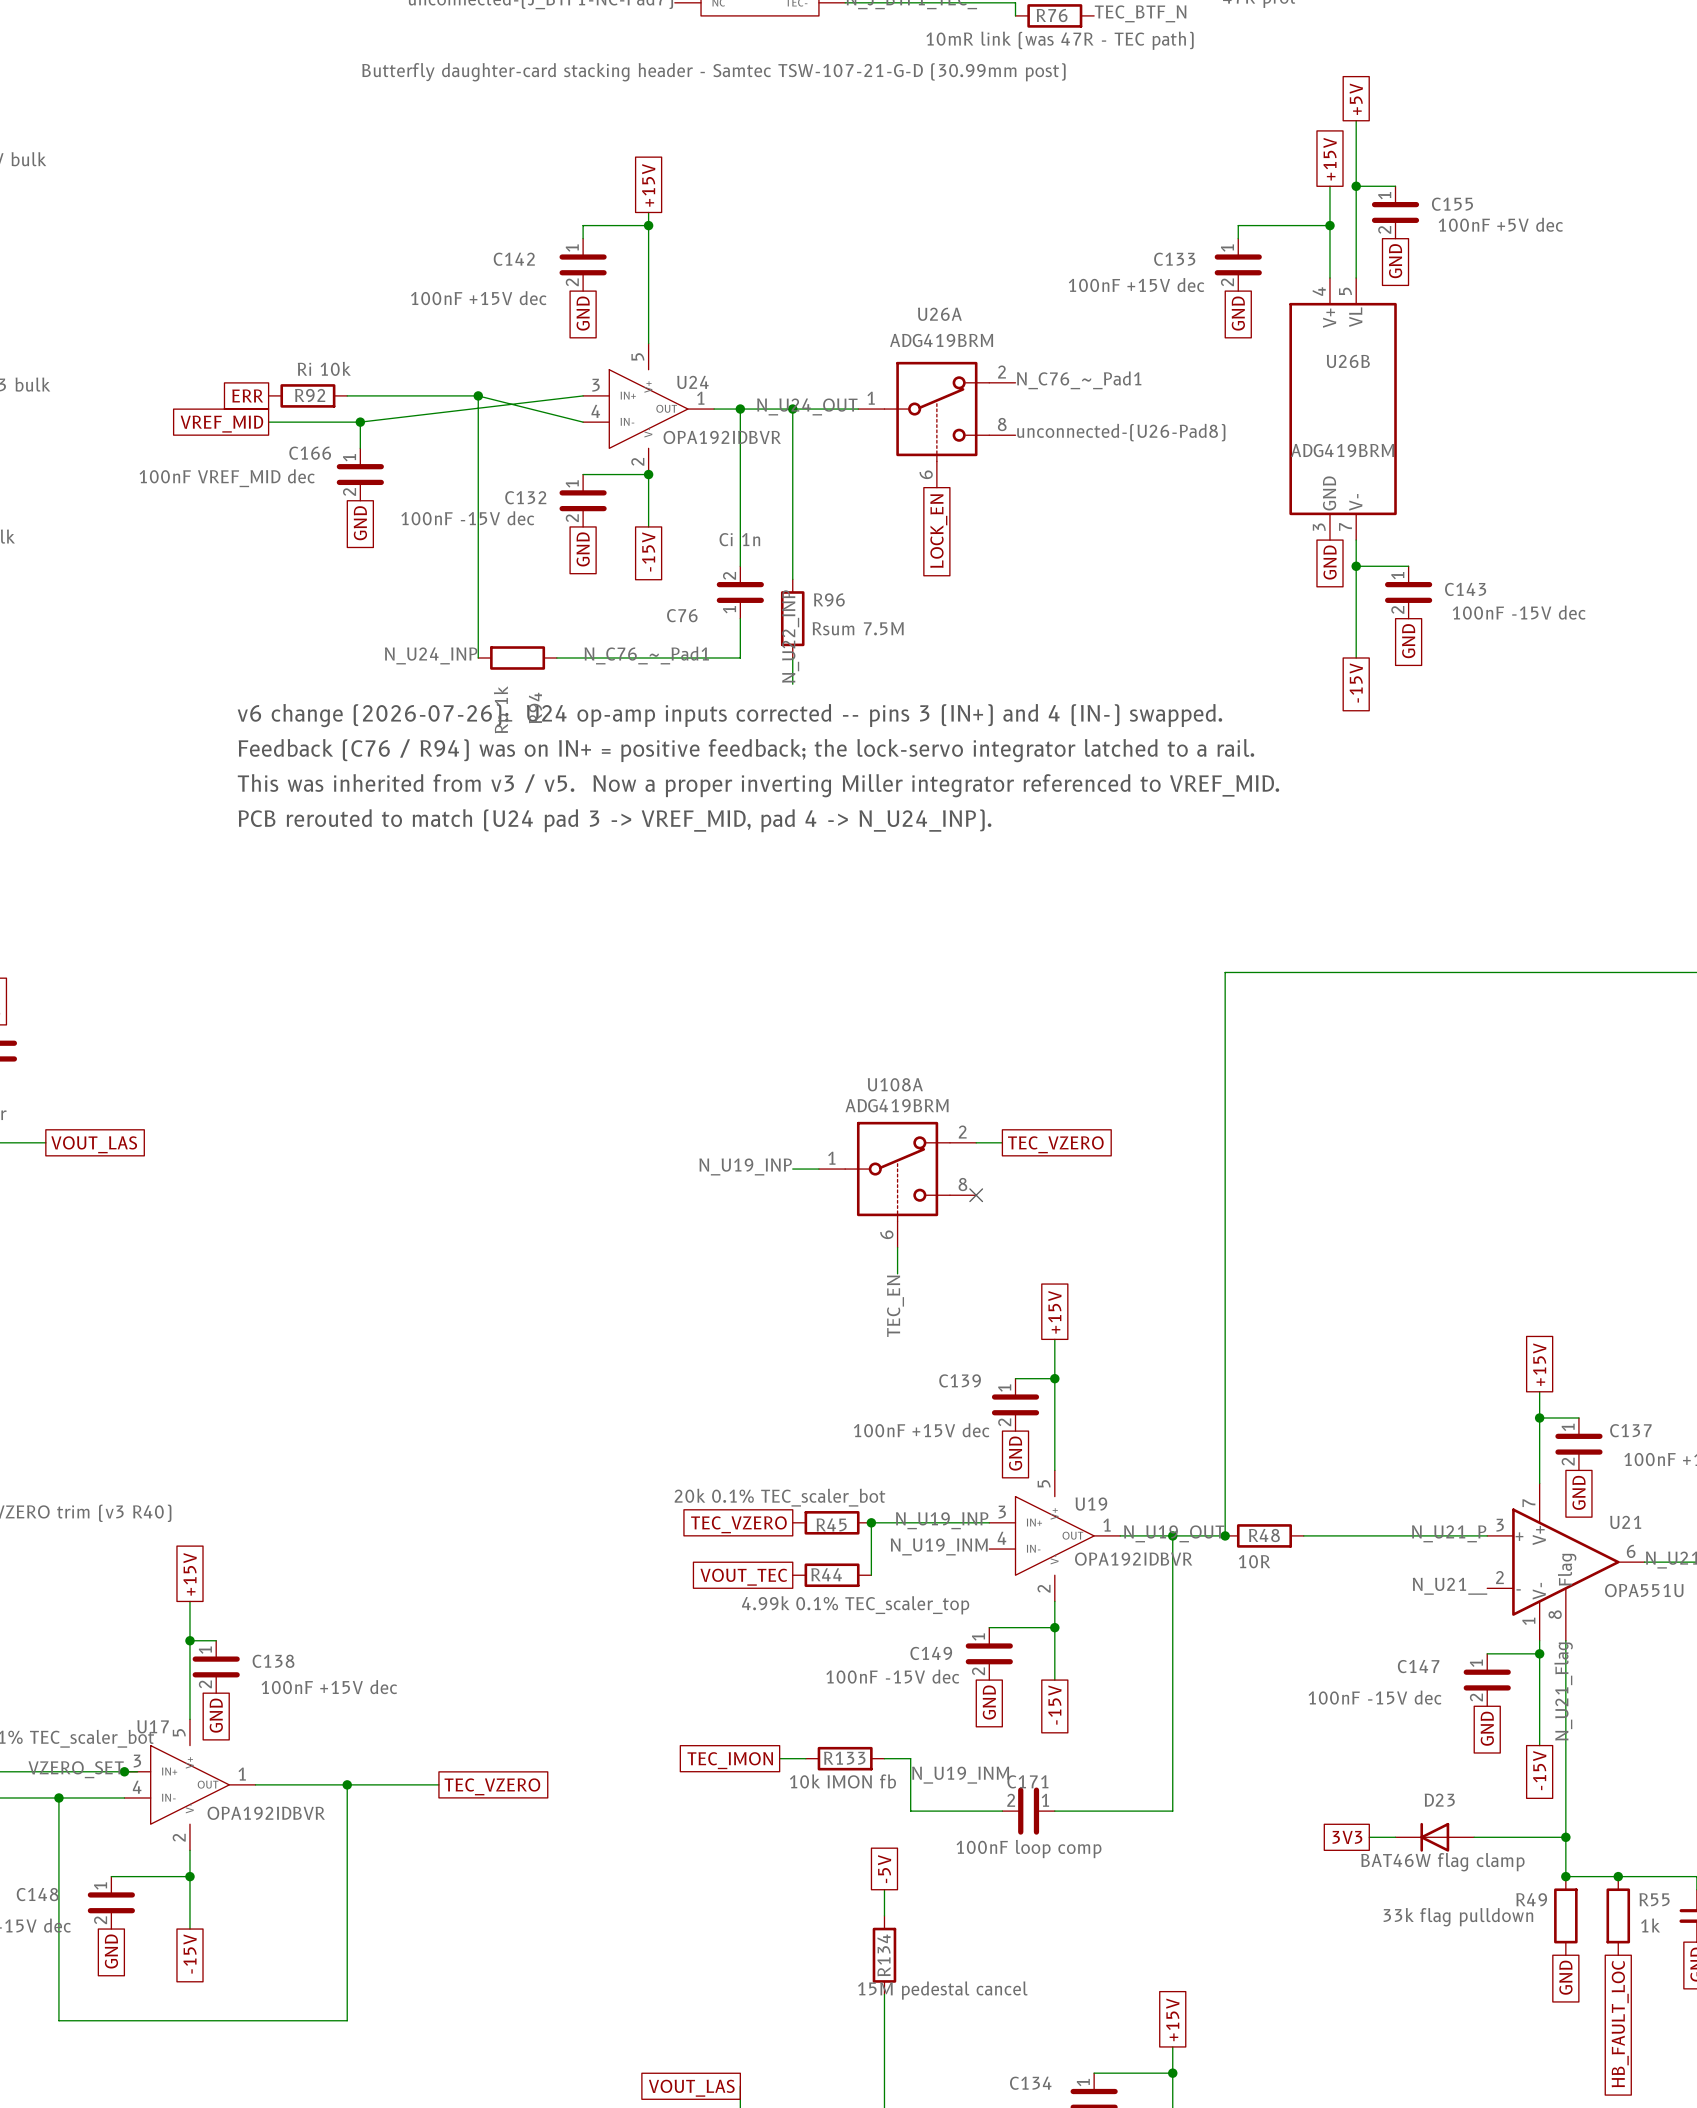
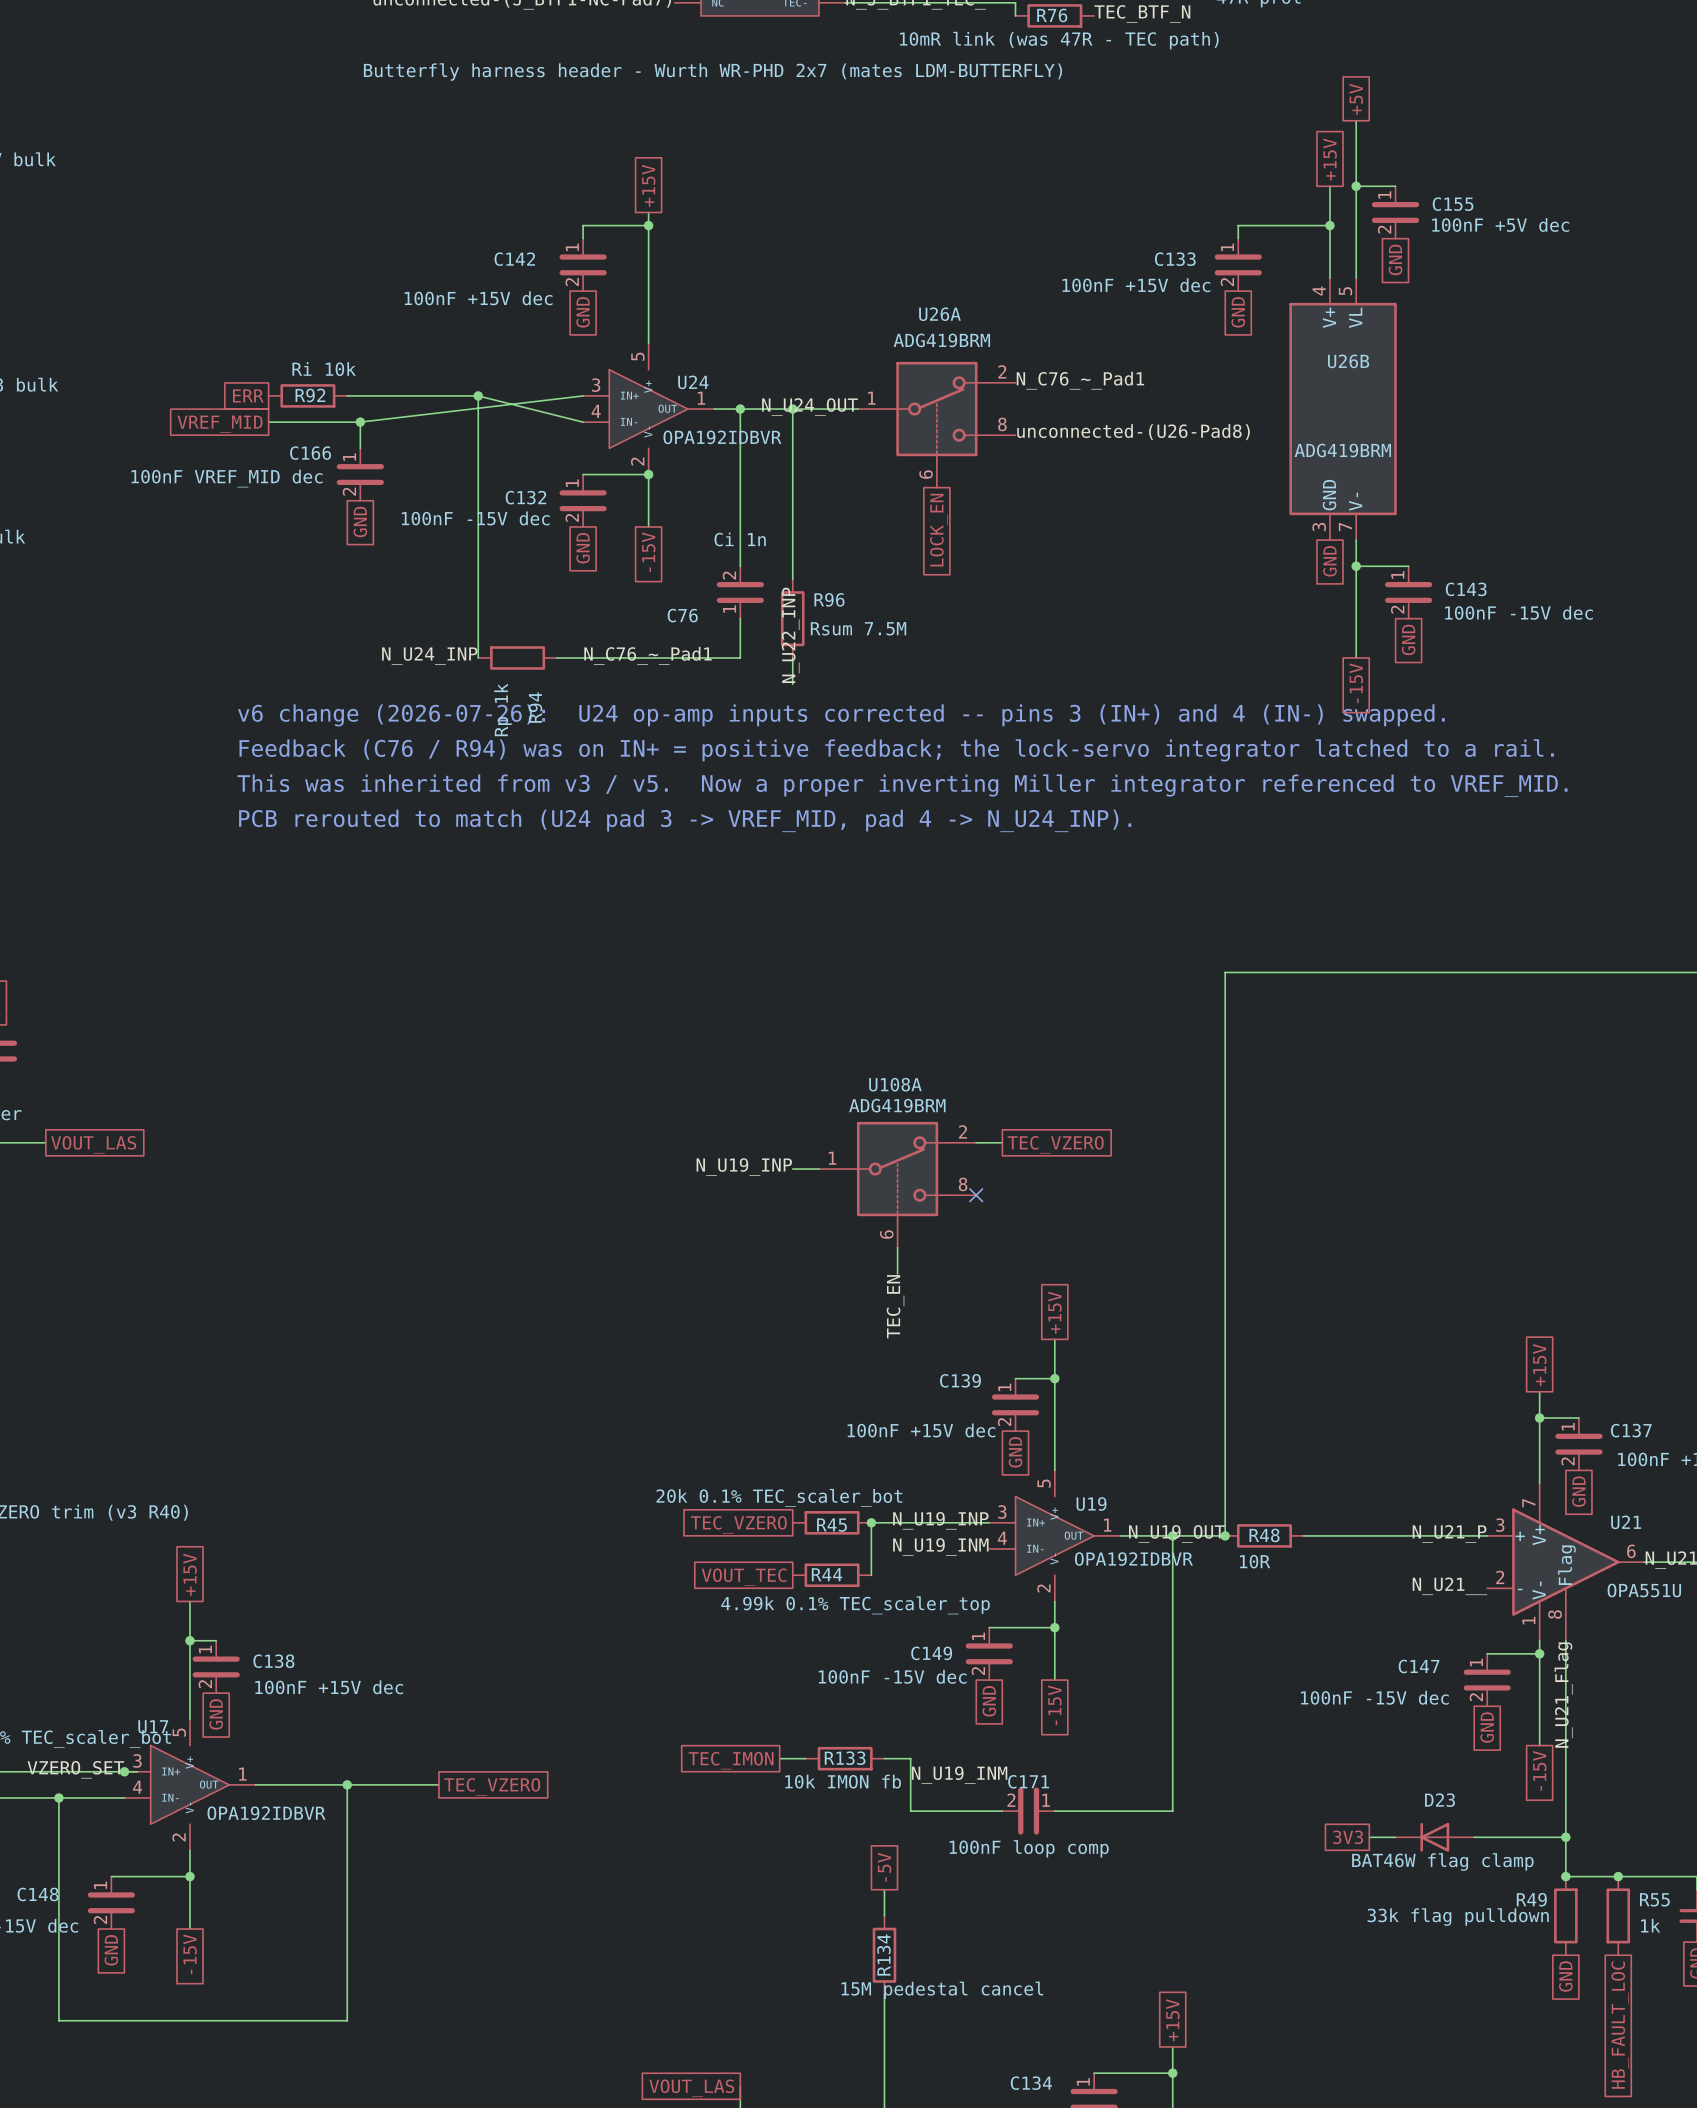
part value: Butterfly daughter-card stacking header - Samtec TSW-107-21-G-D (30.99mm post) (713, 72) -> Butterfly harness header - Wurth WR-PHD 2x7 (mates LDM-BUTTERFLY) (712, 72)

